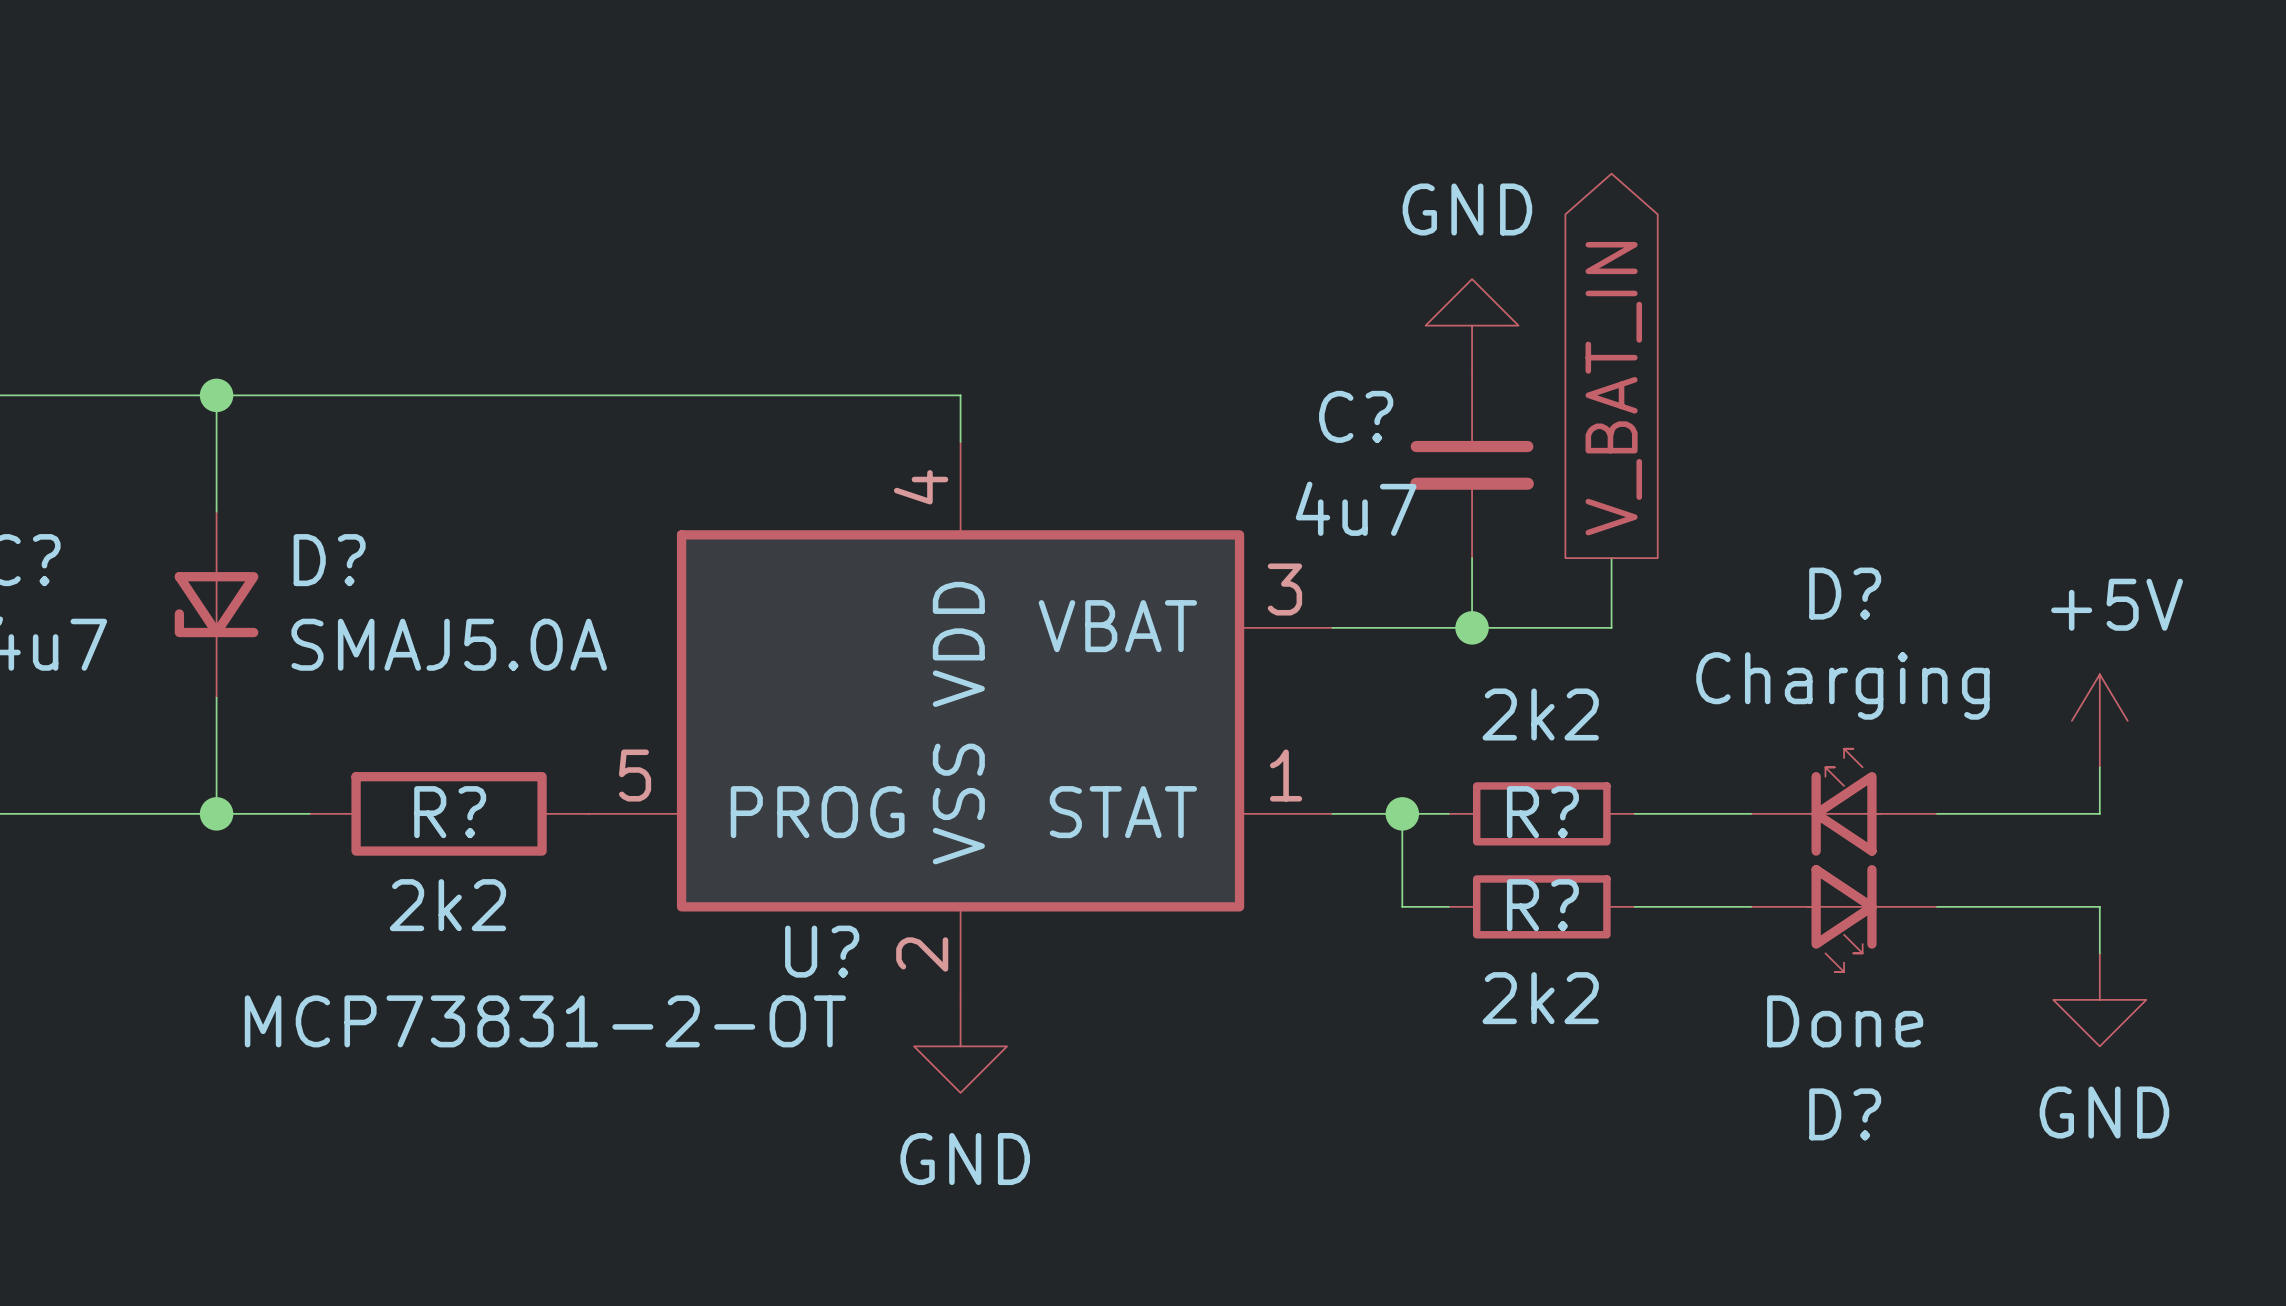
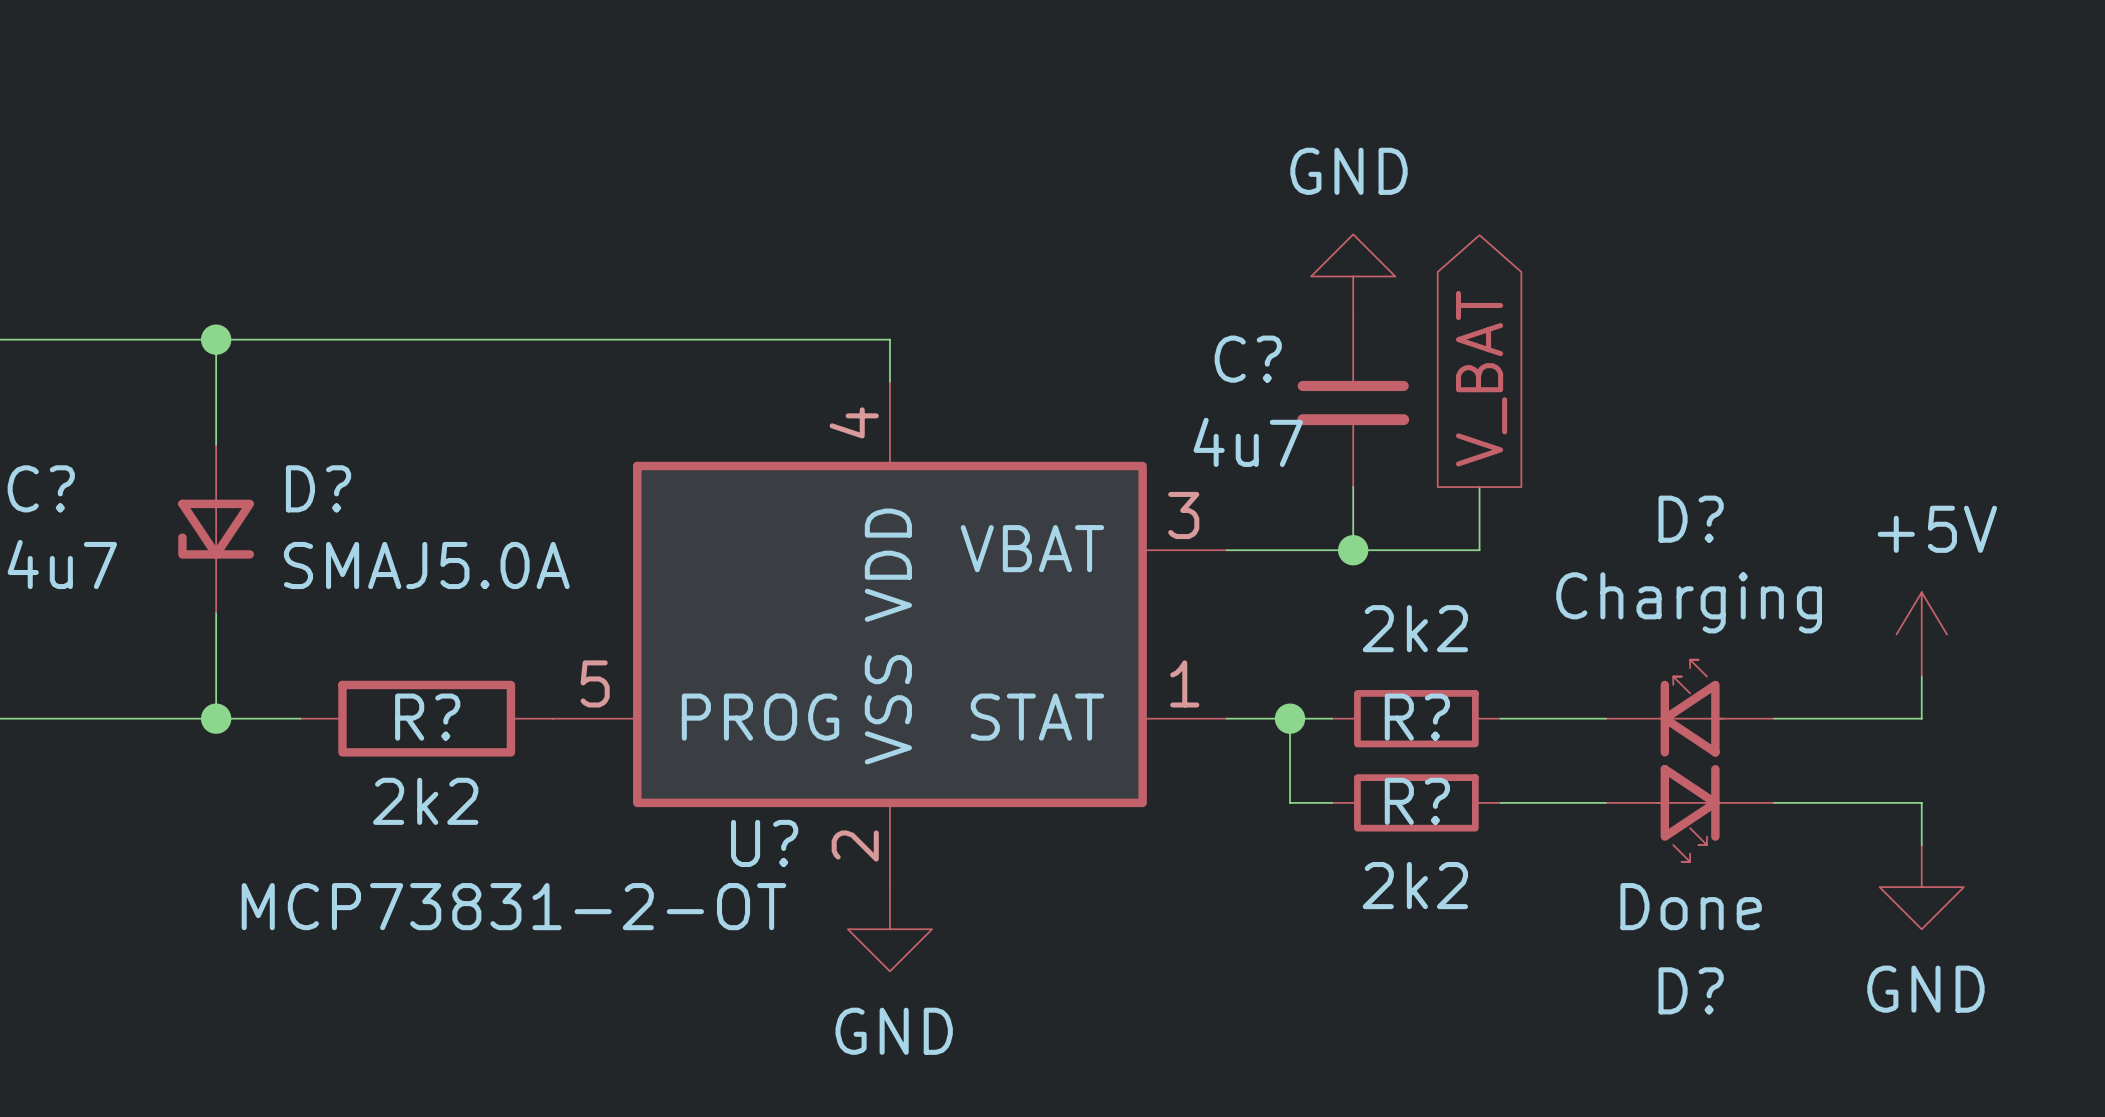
global label: V_BAT_IN (1613, 388) -> V_BAT (1481, 378)

